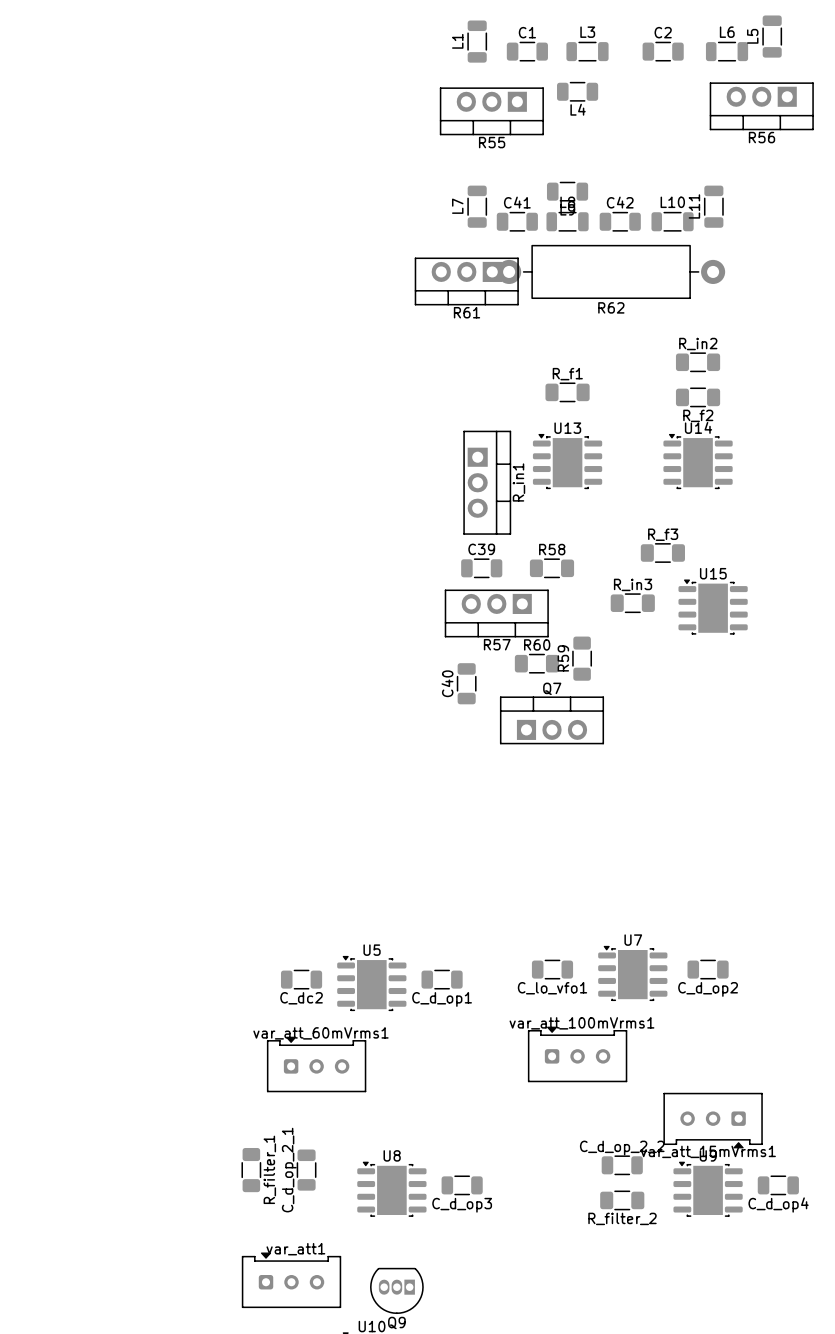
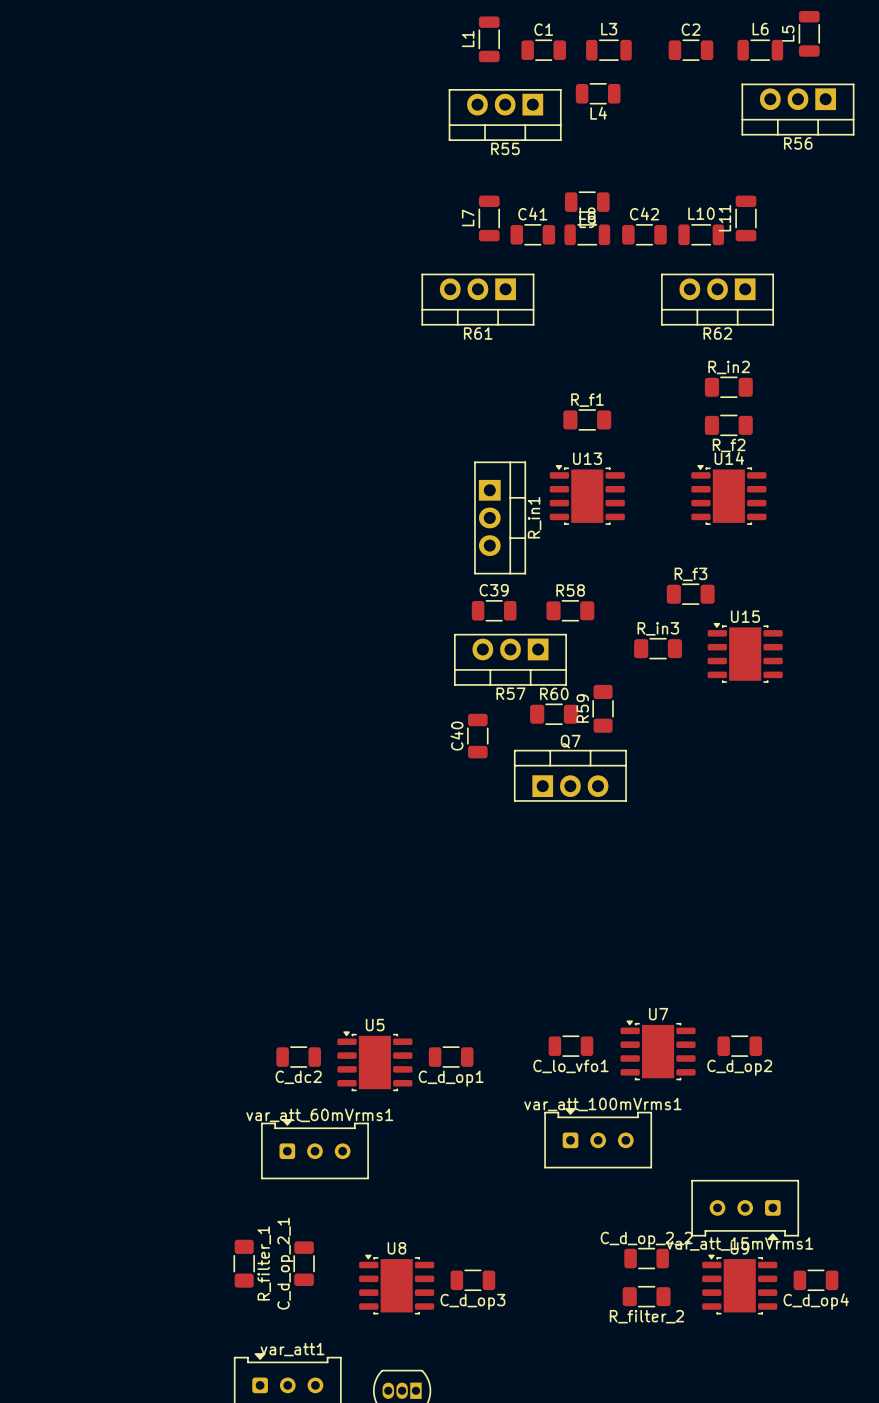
R62 footprint: [497, 245, 726, 299] -> [661, 273, 774, 326]

